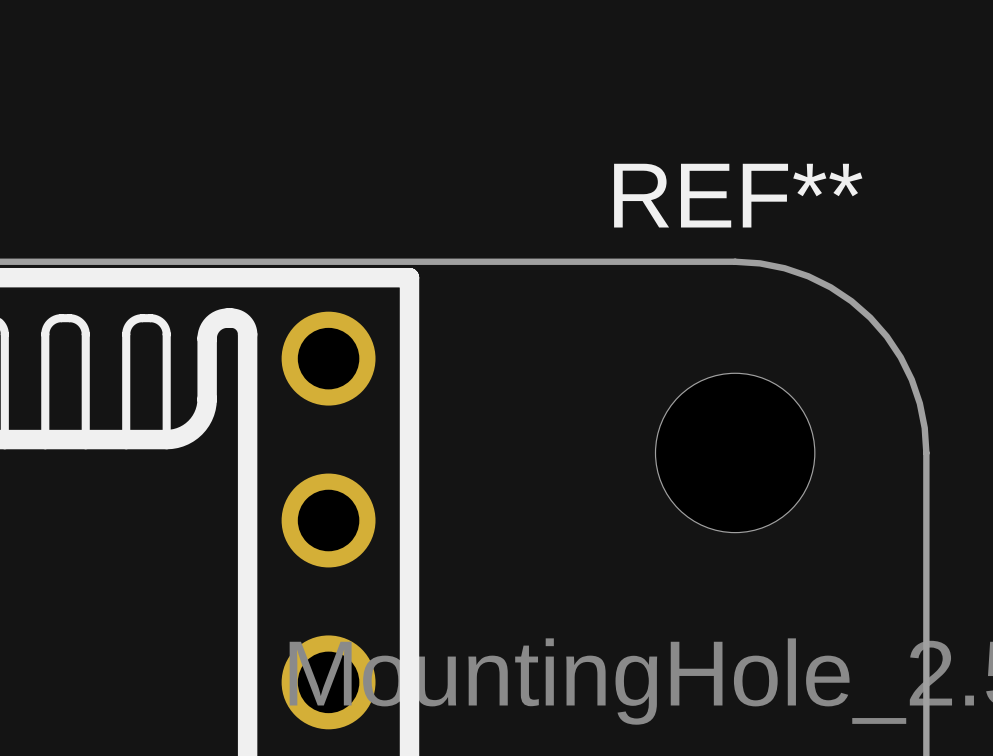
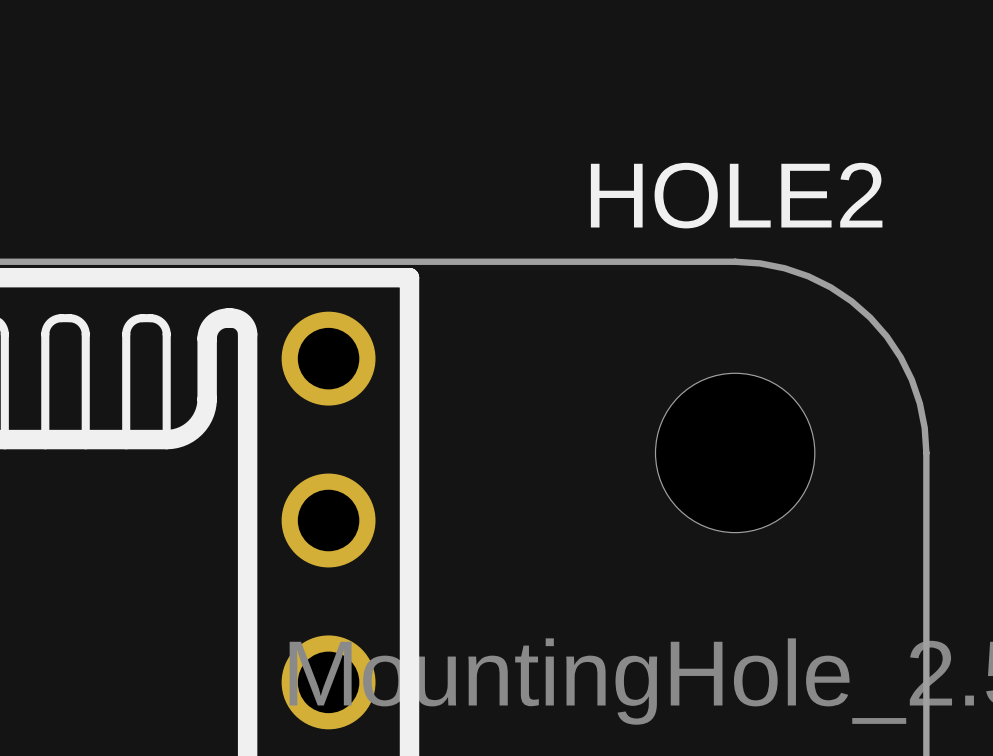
REF** name: REF** (738, 195) -> HOLE2 (736, 195)

